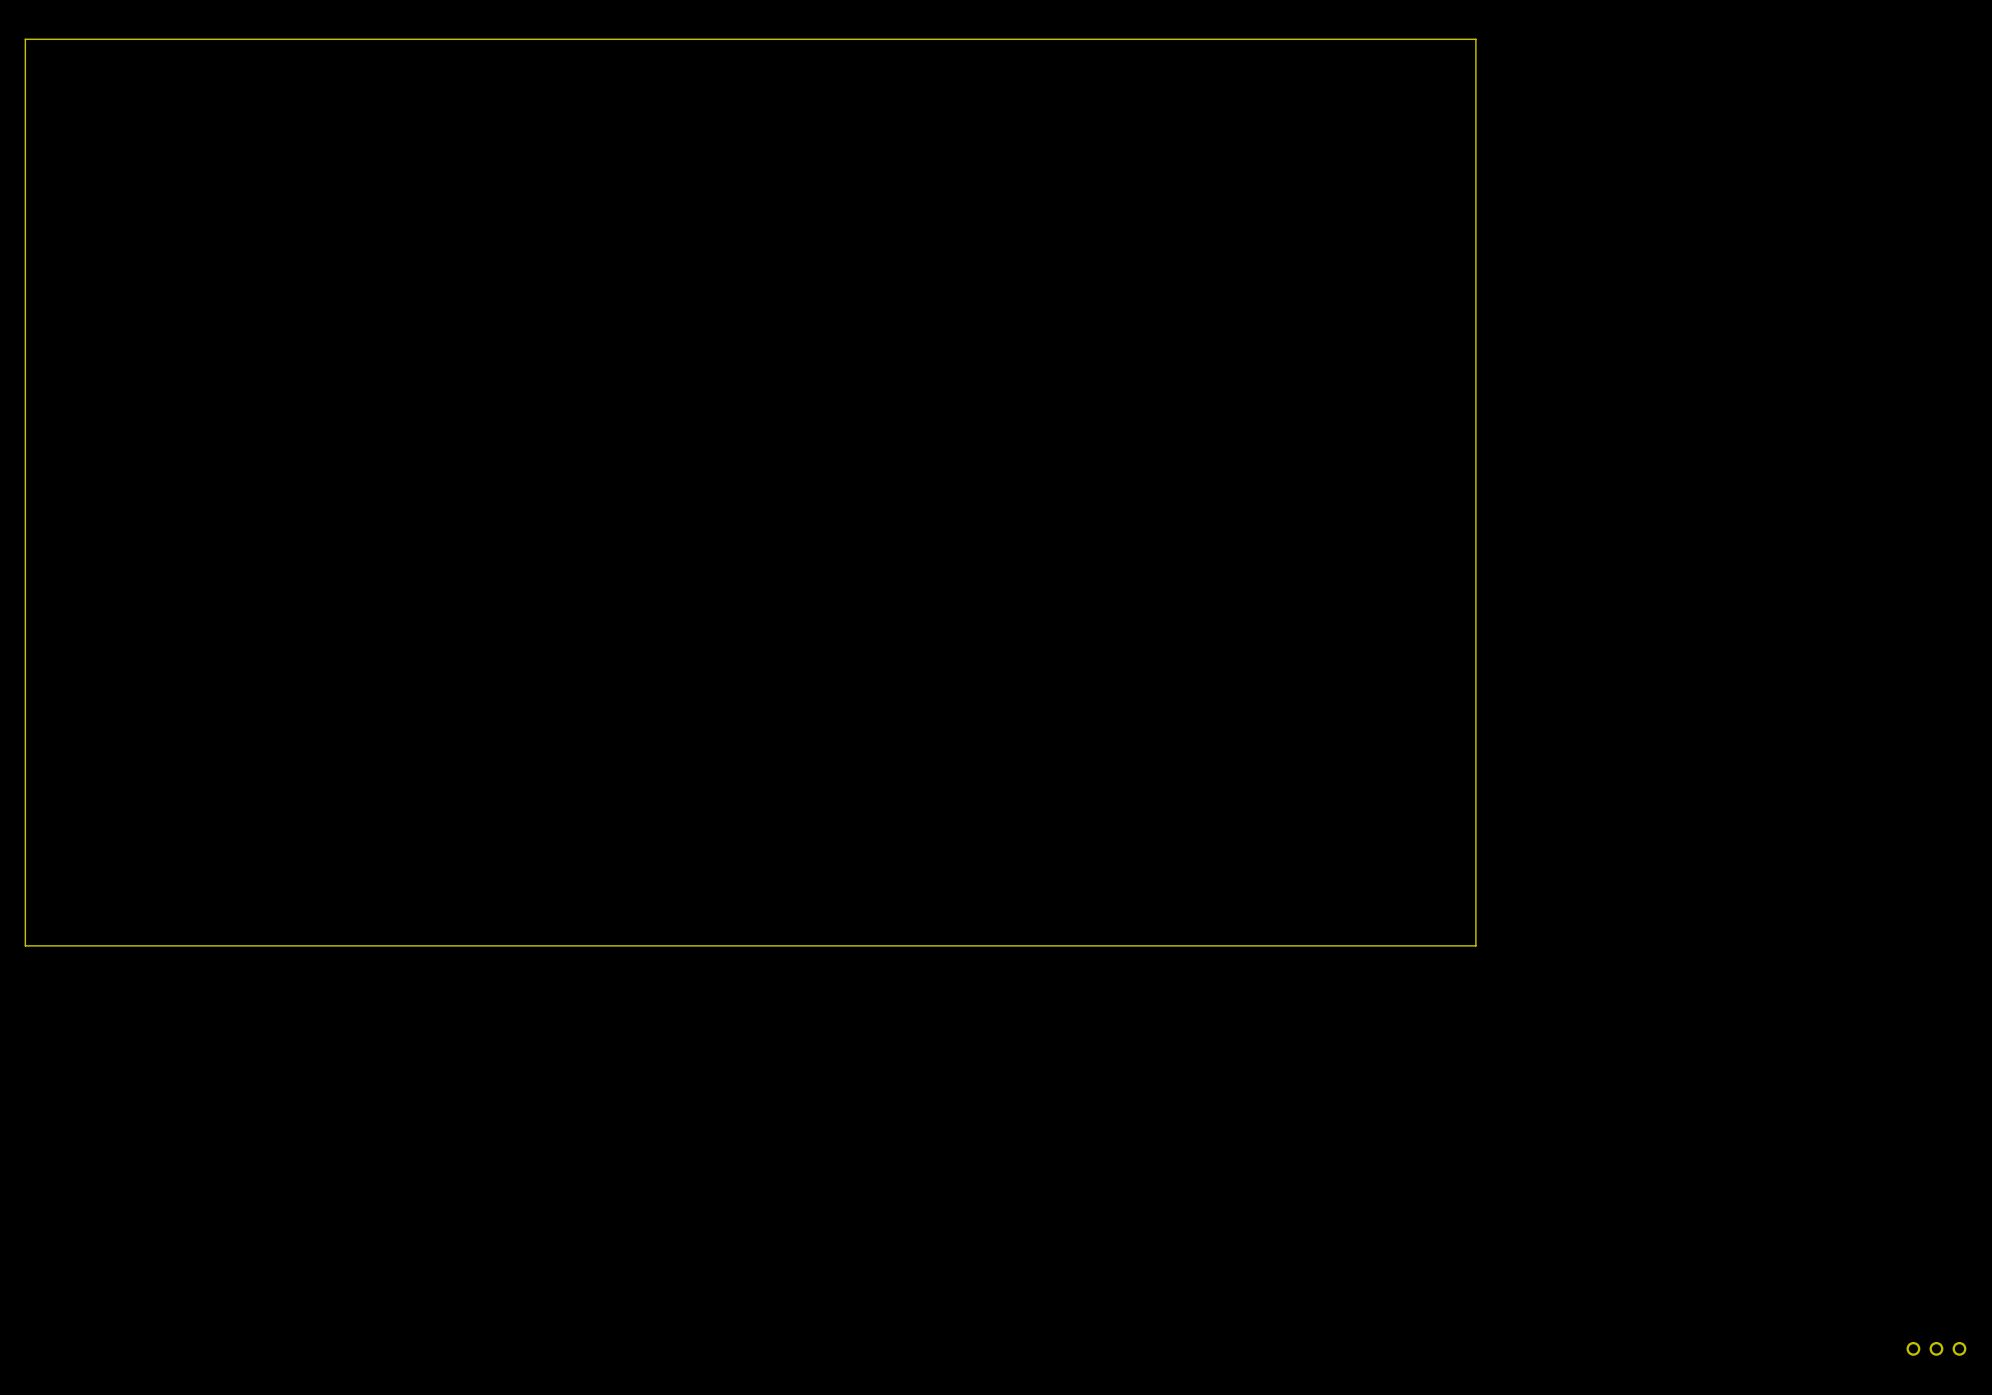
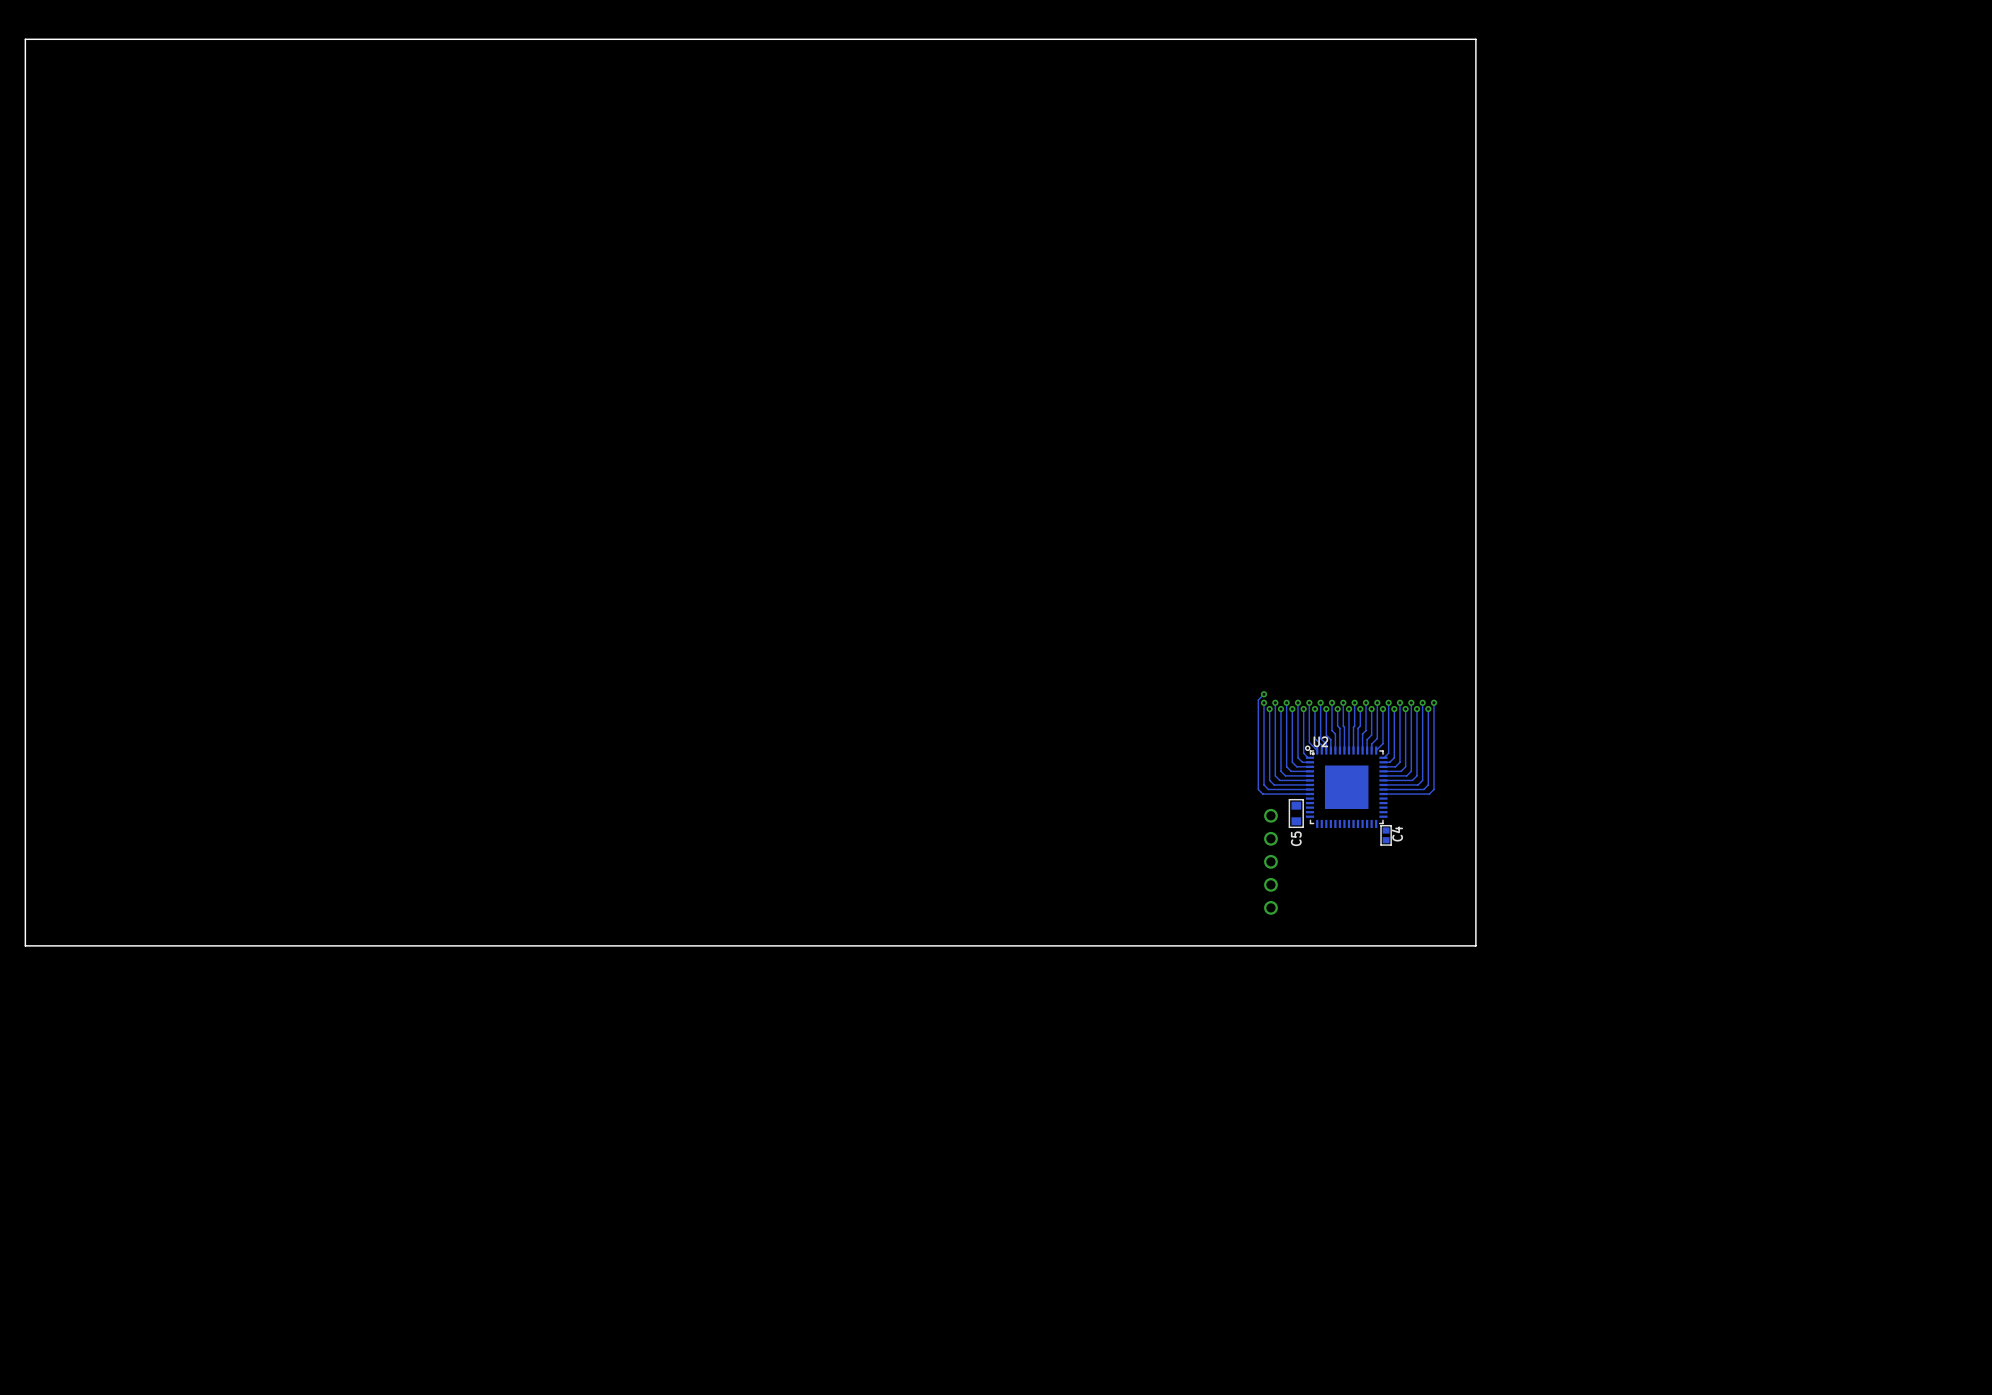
track: none -> (1263, 694) (1258, 699) (1258, 789) (1262, 794) (1310, 794)
via: none -> (1263, 694)
track: none -> (1263, 702) (1263, 784) (1268, 789) (1310, 789)
via: none -> (1263, 702)
track: none -> (1275, 702) (1275, 775) (1279, 780) (1310, 780)
via: none -> (1275, 702)
track: none -> (1286, 702) (1286, 766) (1291, 771) (1310, 771)
via: none -> (1286, 702)
track: none -> (1297, 702) (1297, 757) (1302, 762) (1310, 762)
via: none -> (1297, 702)
track: none -> (1309, 702) (1309, 742) (1317, 750)
via: none -> (1309, 702)
track: none -> (1320, 702) (1320, 738) (1326, 744) (1326, 750)
via: none -> (1320, 702)
track: none -> (1331, 702) (1331, 730) (1335, 733) (1335, 750)
via: none -> (1331, 702)
track: none -> (1343, 702) (1344, 750)
via: none -> (1343, 702)
track: none -> (1354, 702) (1353, 750)
via: none -> (1354, 702)
track: none -> (1365, 702) (1365, 730) (1362, 733) (1362, 750)
via: none -> (1365, 702)
track: none -> (1377, 702) (1377, 738) (1371, 744) (1371, 750)
via: none -> (1377, 702)
track: none -> (1388, 702) (1388, 753) (1383, 757)
via: none -> (1388, 702)
track: none -> (1399, 702) (1399, 762) (1395, 766) (1383, 766)
via: none -> (1399, 702)
track: none -> (1411, 702) (1411, 771) (1406, 775) (1383, 775)
via: none -> (1411, 702)
track: none -> (1422, 702) (1422, 780) (1418, 784) (1383, 784)
via: none -> (1422, 702)
track: none -> (1433, 702) (1433, 789) (1429, 794) (1383, 794)
via: none -> (1433, 702)
track: none -> (1269, 709) (1269, 780) (1274, 784) (1310, 784)
via: none -> (1269, 709)
track: none -> (1280, 709) (1280, 771) (1285, 775) (1310, 775)
via: none -> (1280, 709)
track: none -> (1292, 709) (1292, 762) (1296, 766) (1310, 766)
via: none -> (1292, 709)
track: none -> (1303, 709) (1303, 753) (1310, 757)
via: none -> (1303, 709)
track: none -> (1314, 709) (1314, 738) (1321, 745) (1321, 750)
via: none -> (1314, 709)
track: none -> (1326, 709) (1326, 735) (1330, 739) (1330, 750)
via: none -> (1326, 709)
track: none -> (1337, 709) (1339, 750)
via: none -> (1337, 709)
track: none -> (1348, 709) (1348, 750)
via: none -> (1348, 709)
track: none -> (1360, 709) (1358, 750)
via: none -> (1360, 709)
track: none -> (1371, 709) (1371, 735) (1367, 739) (1367, 750)
via: none -> (1371, 709)
track: none -> (1382, 709) (1382, 743) (1376, 750)
via: none -> (1382, 709)
track: none -> (1394, 709) (1394, 757) (1389, 762) (1383, 762)
via: none -> (1394, 709)
track: none -> (1405, 709) (1405, 766) (1401, 771) (1383, 771)
via: none -> (1405, 709)
track: none -> (1416, 709) (1416, 775) (1412, 780) (1383, 780)
via: none -> (1416, 709)
track: none -> (1428, 709) (1428, 784) (1423, 789) (1383, 789)
via: none -> (1428, 709)
U2: none -> (1346, 786)
C5: none -> (1296, 813)
C4: none -> (1386, 835)
part: none -> (1270, 861)
part: (1936, 1348) -> none

